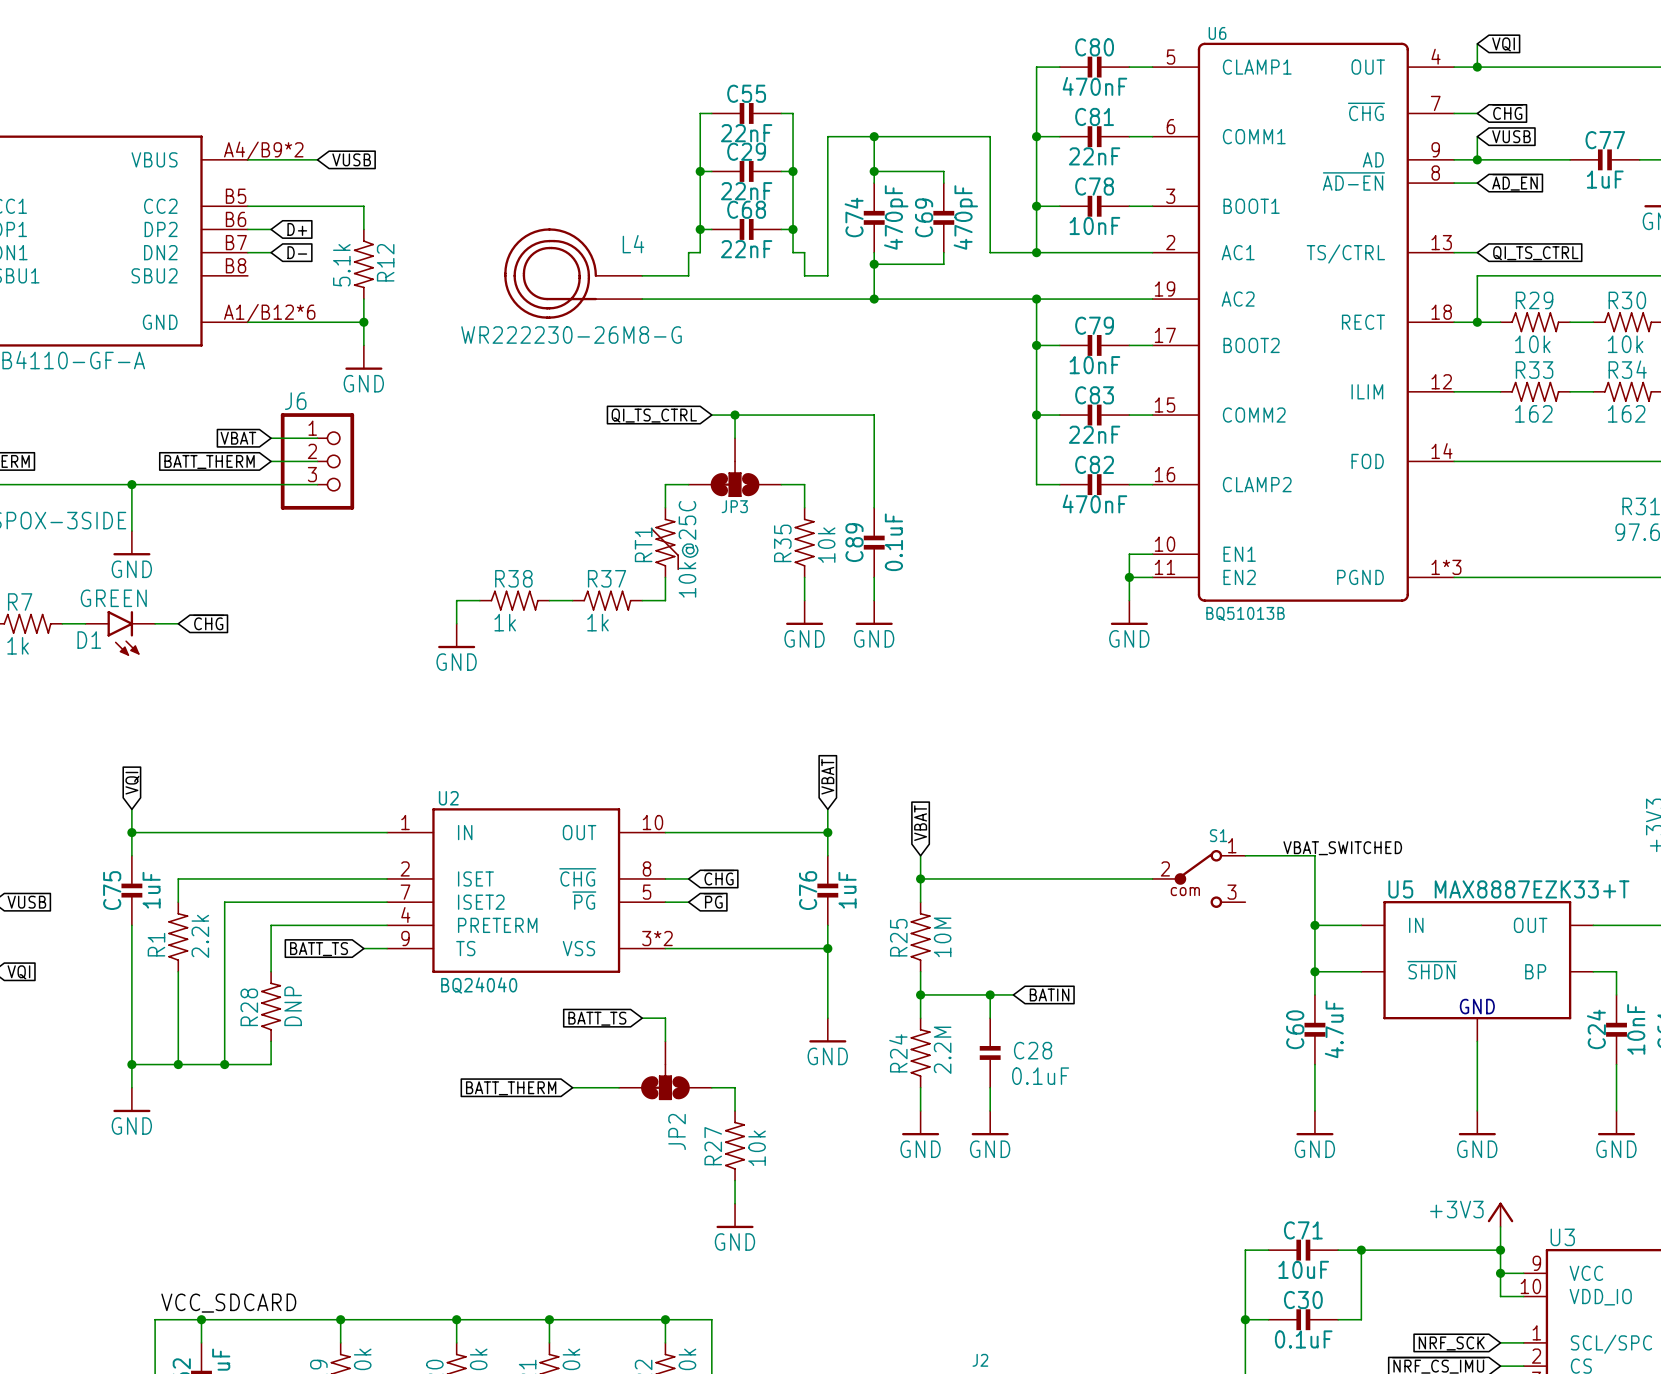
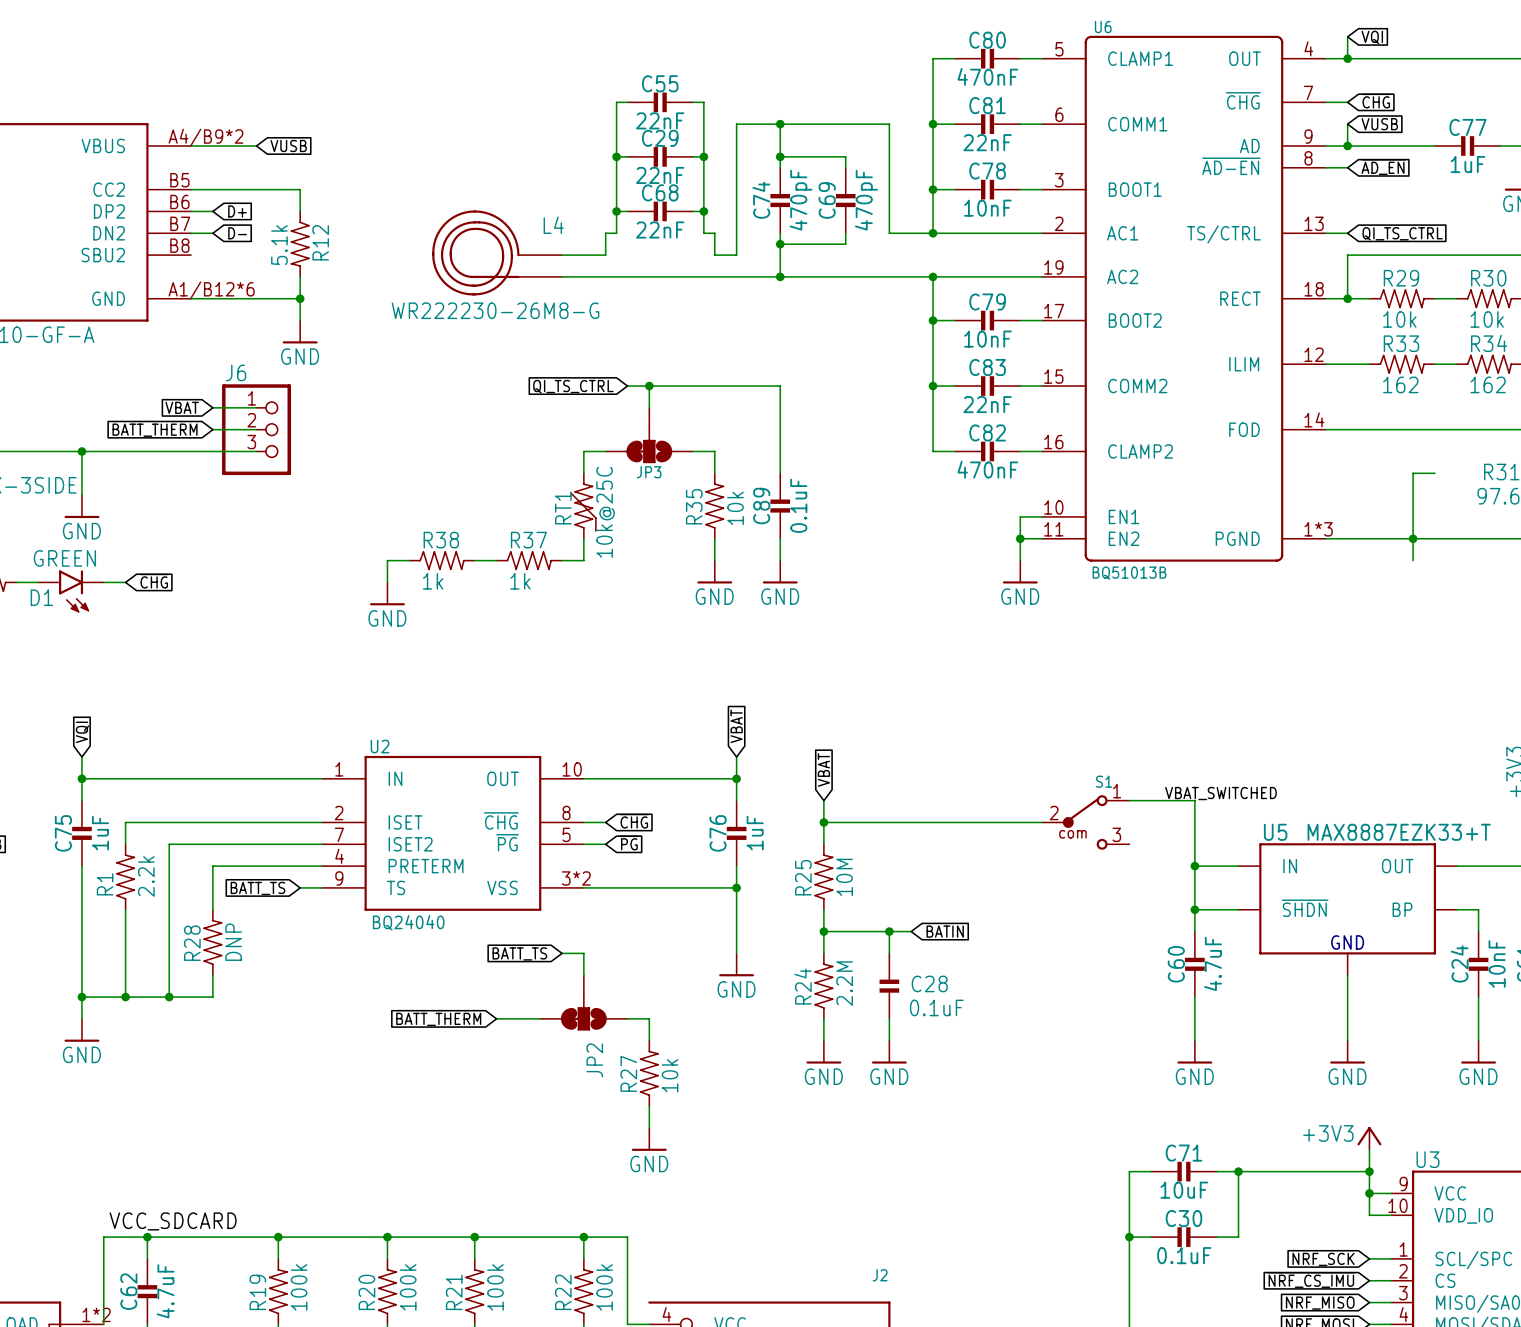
wire: none -> (1434, 473) (1413, 473) (1413, 560)
junction: none -> (1413, 538)

